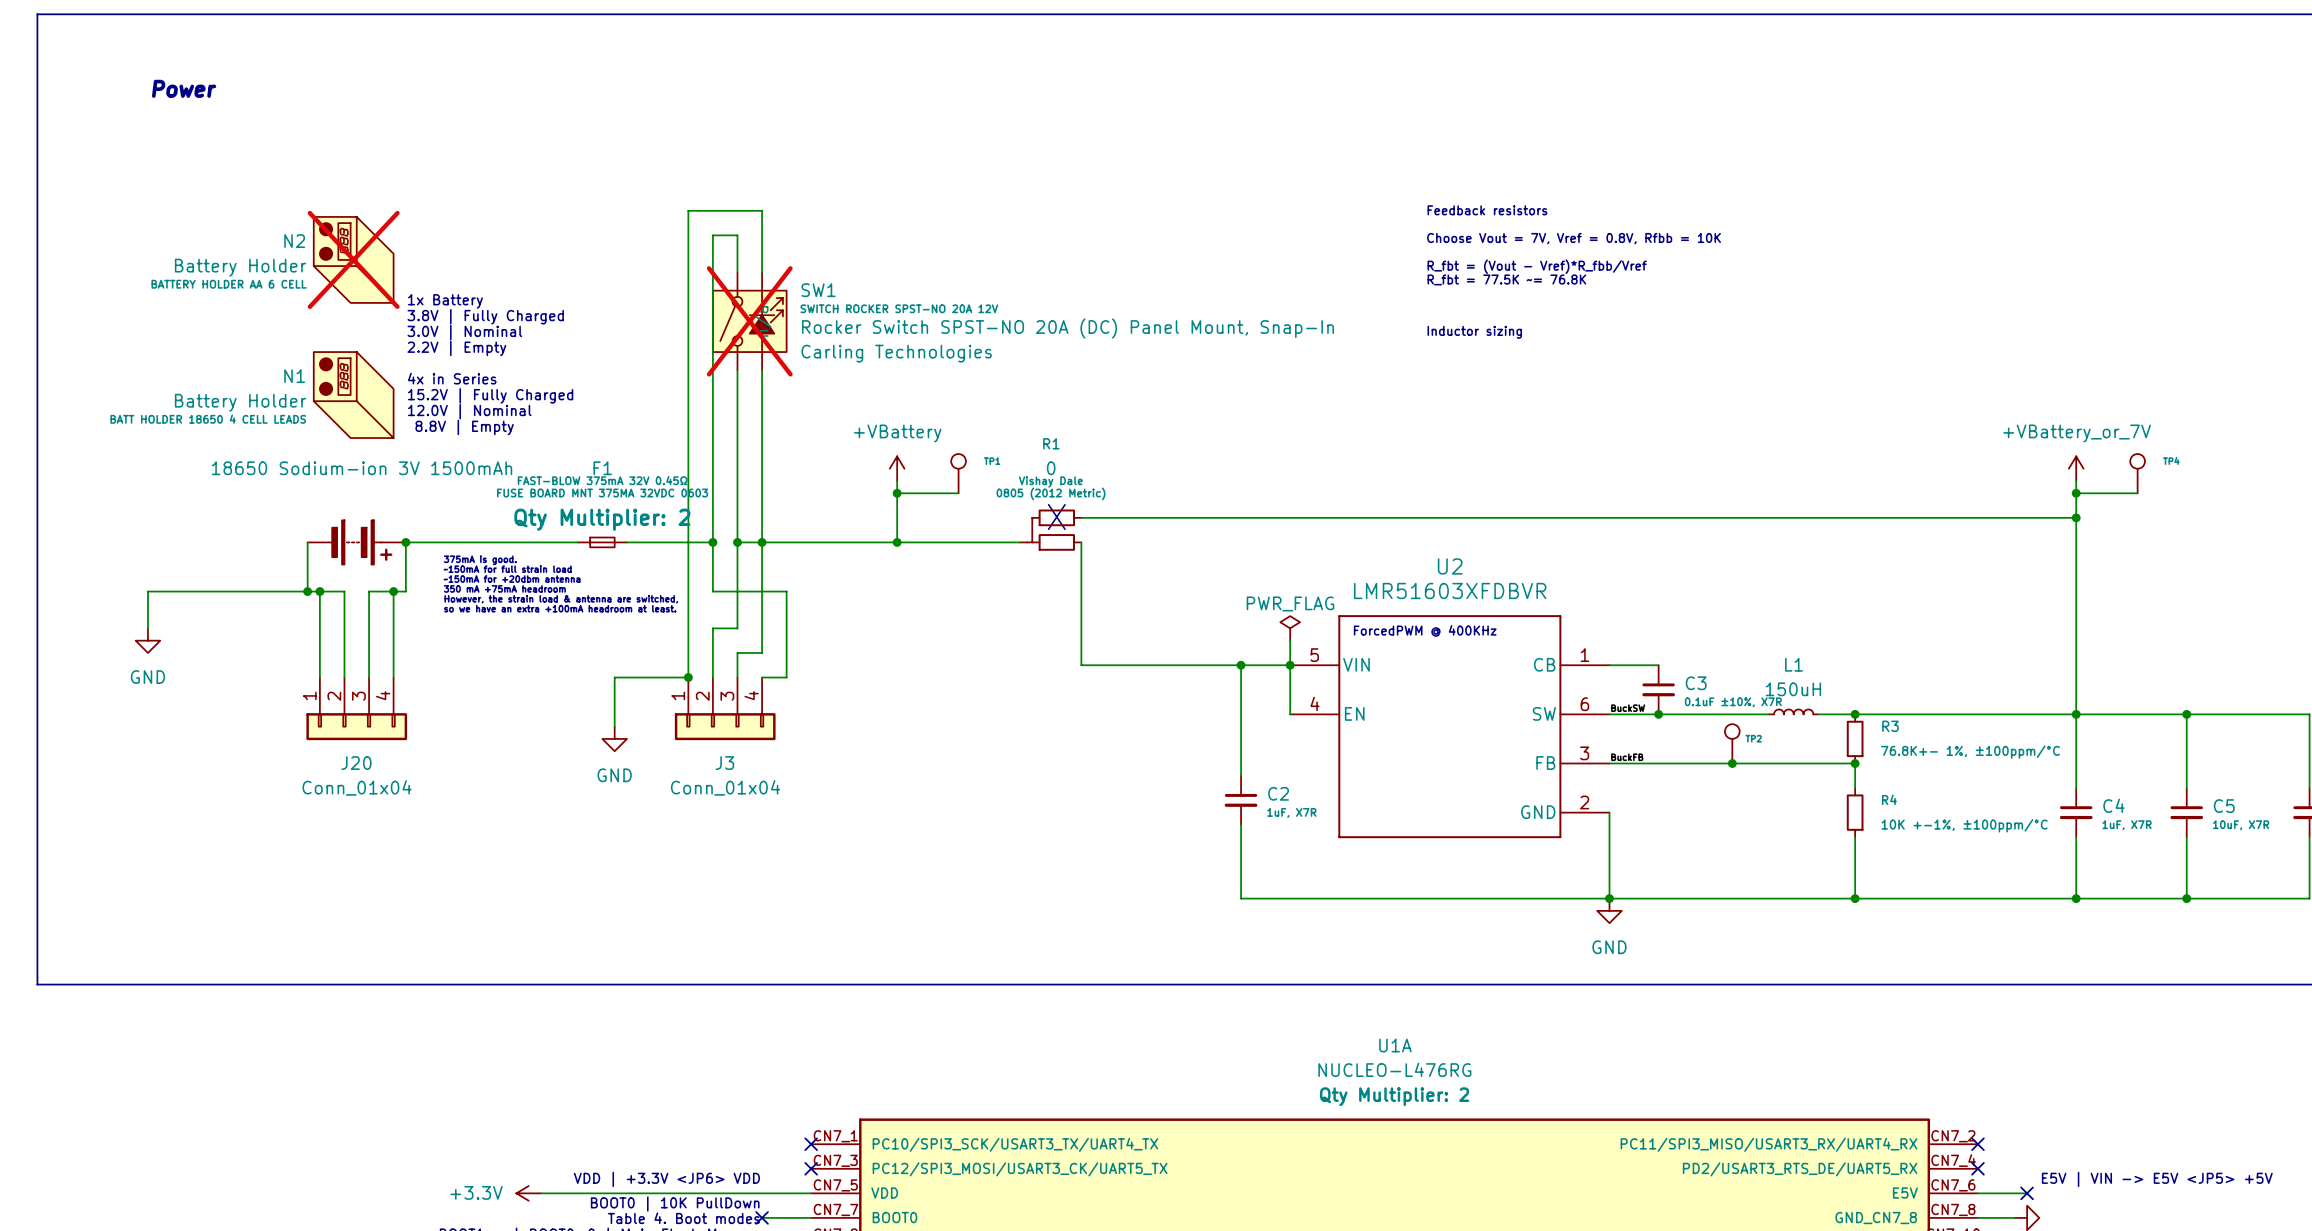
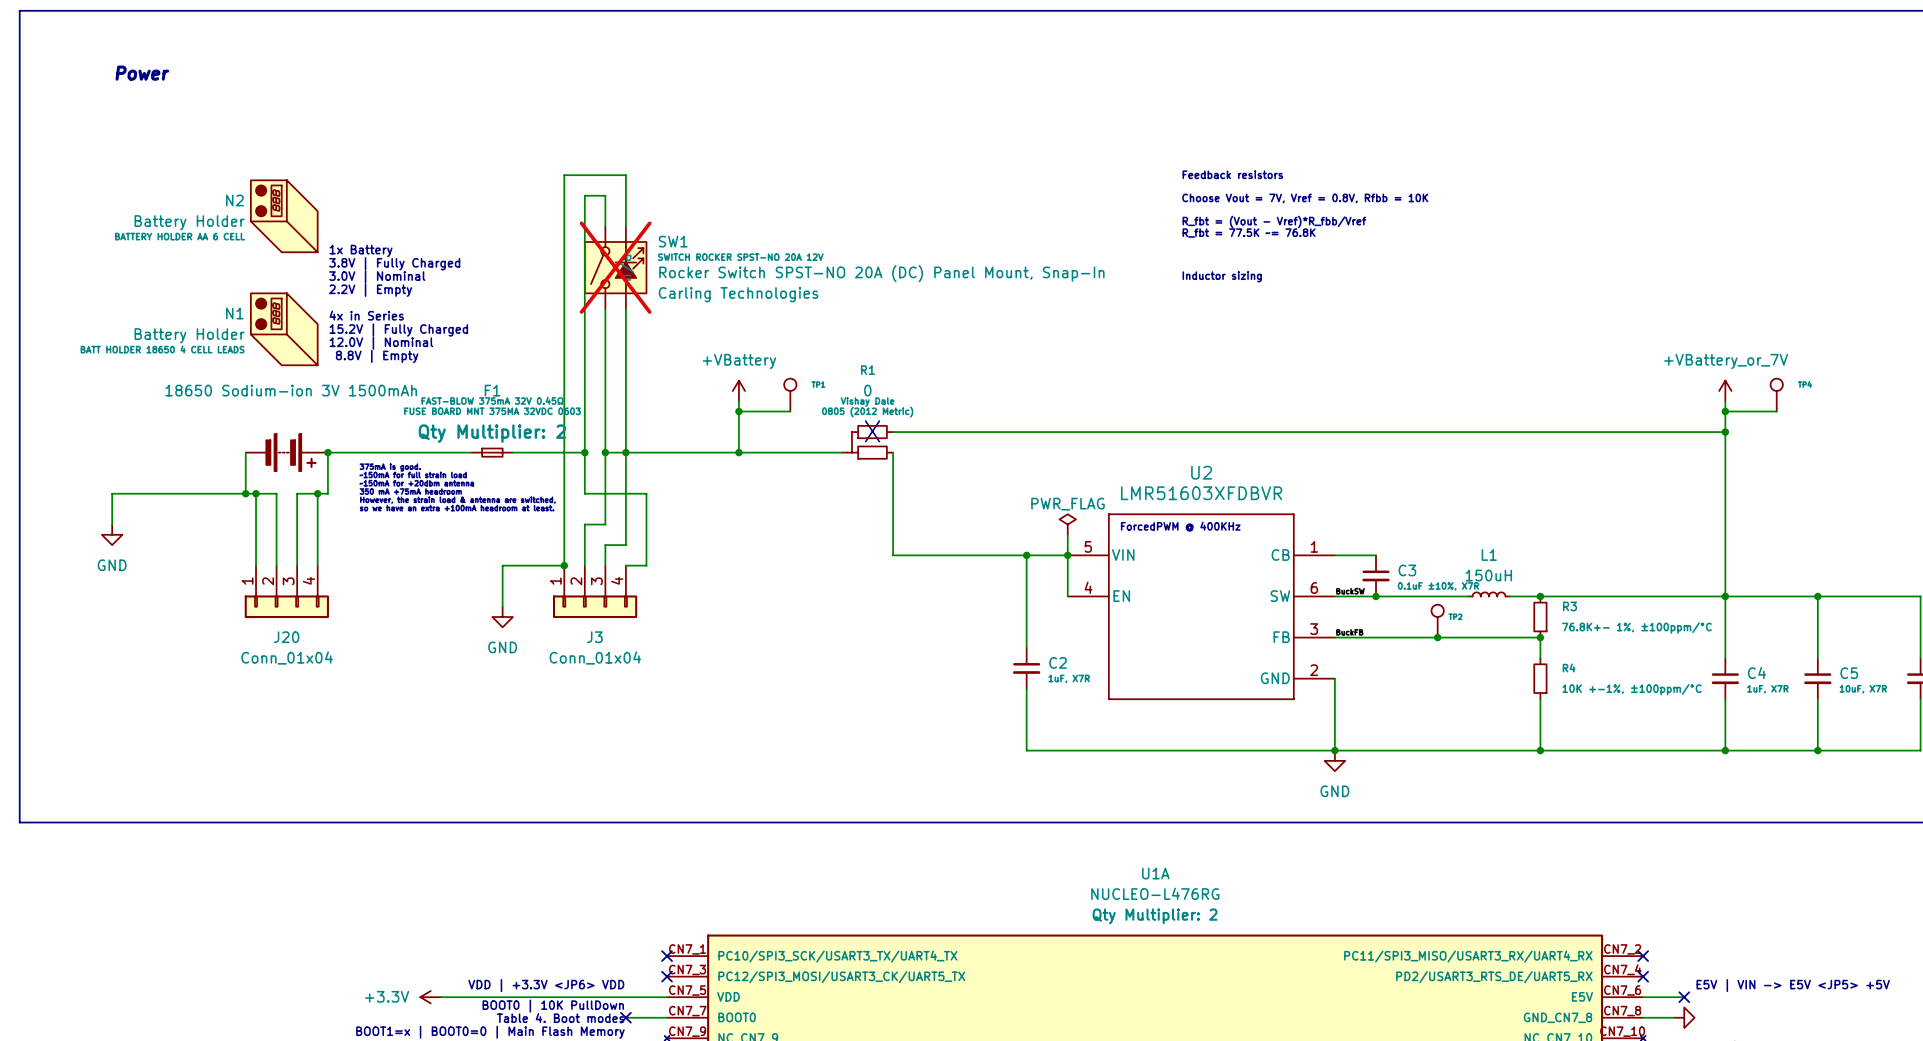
N2 do-not-place cross: (353, 259) -> none

